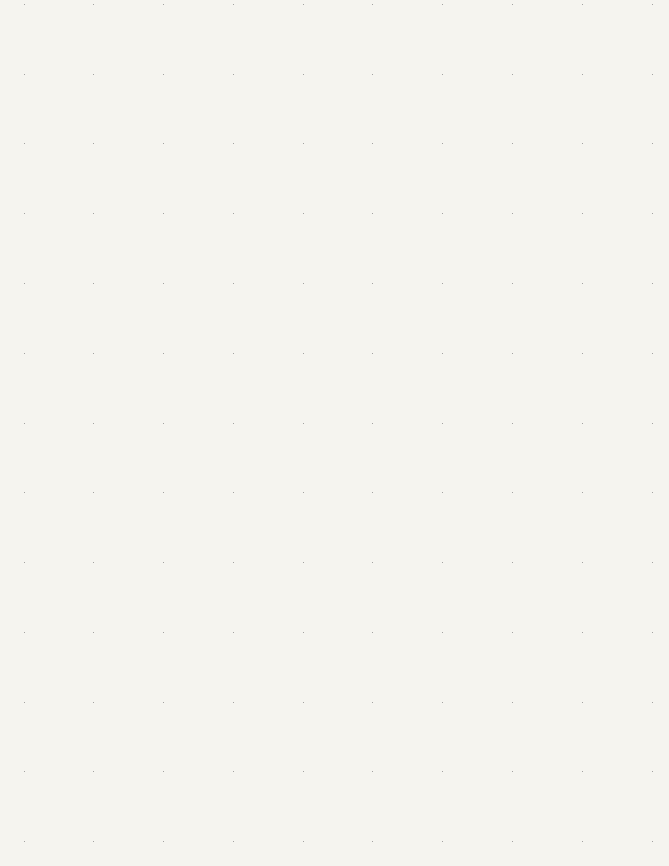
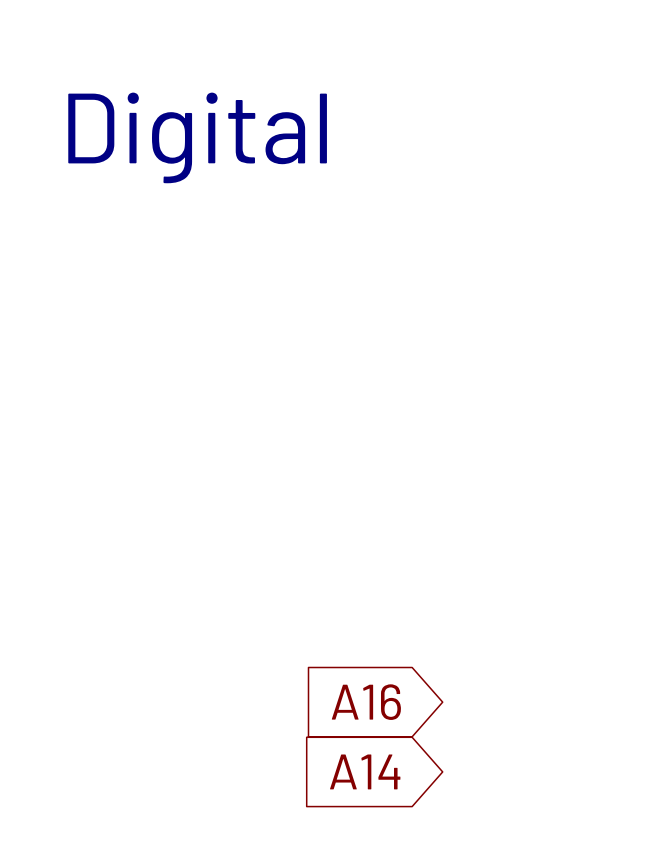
text: none -> Digital (197, 137)
global label: none -> A16 (366, 702)
global label: none -> A14 (365, 771)

